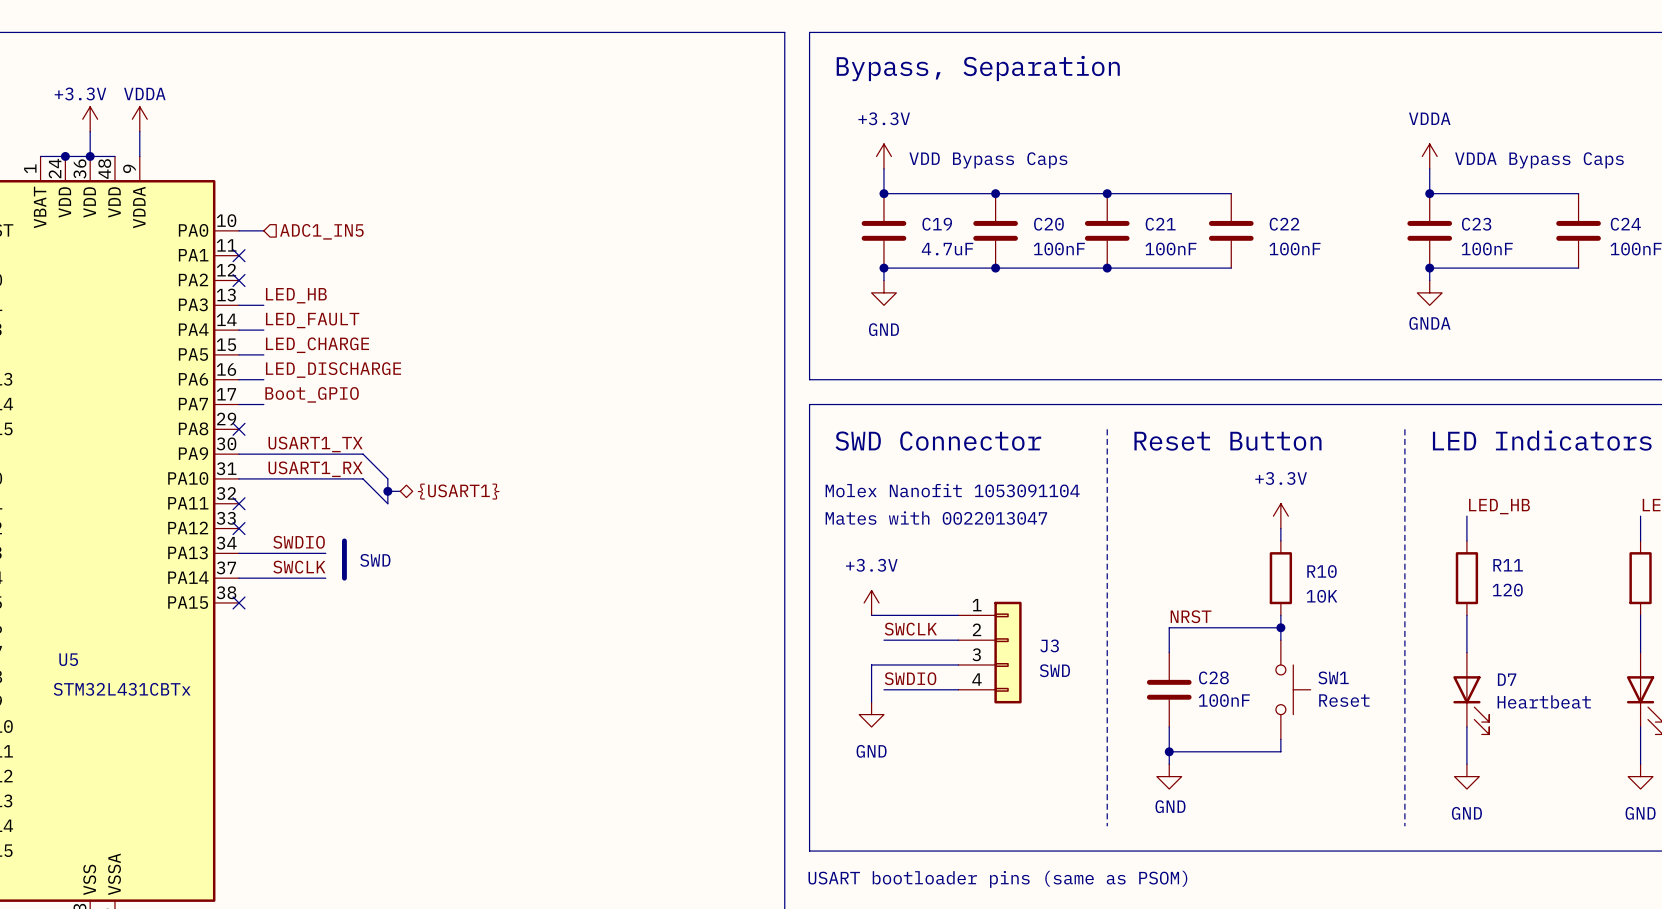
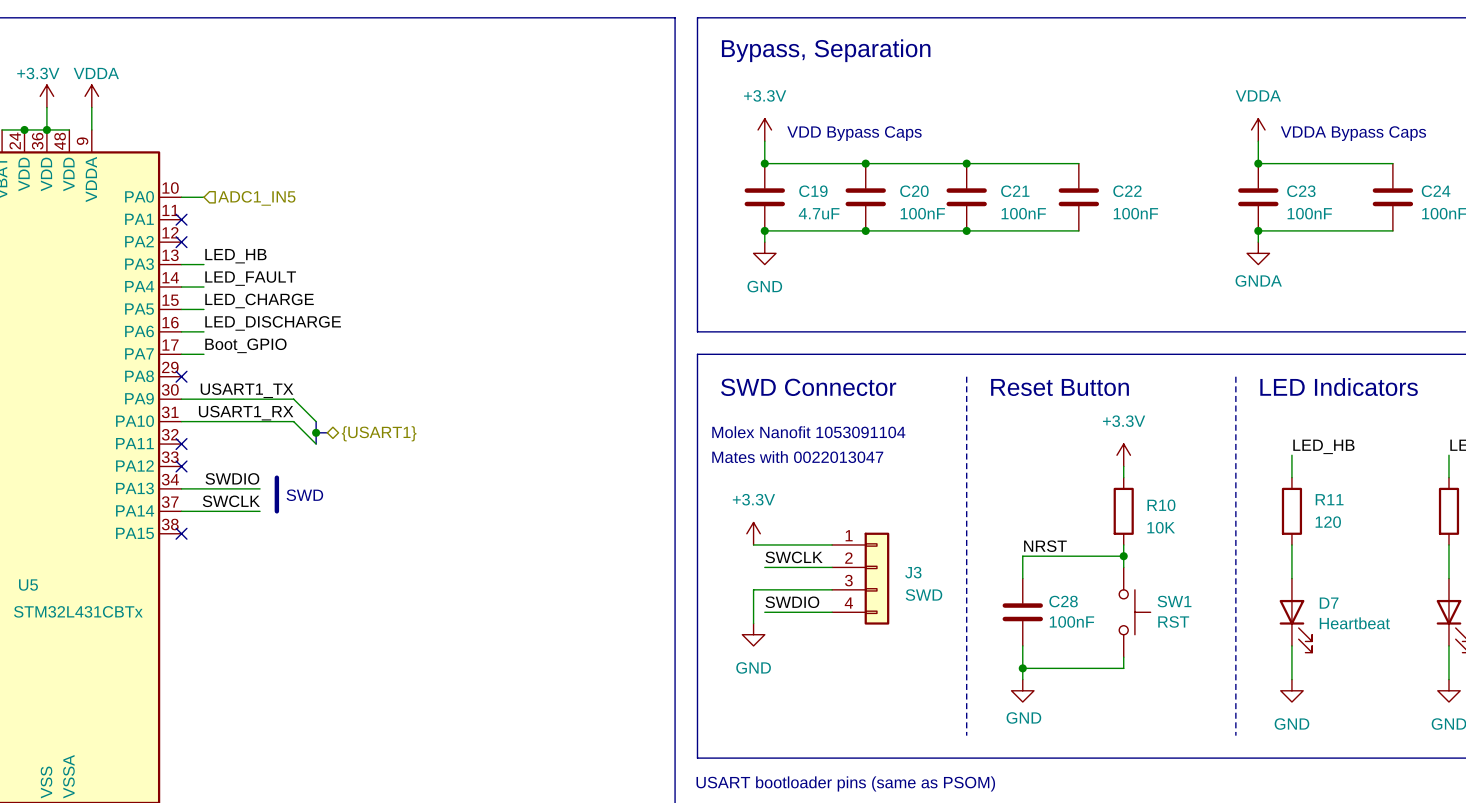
SW1 value: Reset (1344, 700) -> RST (1173, 621)

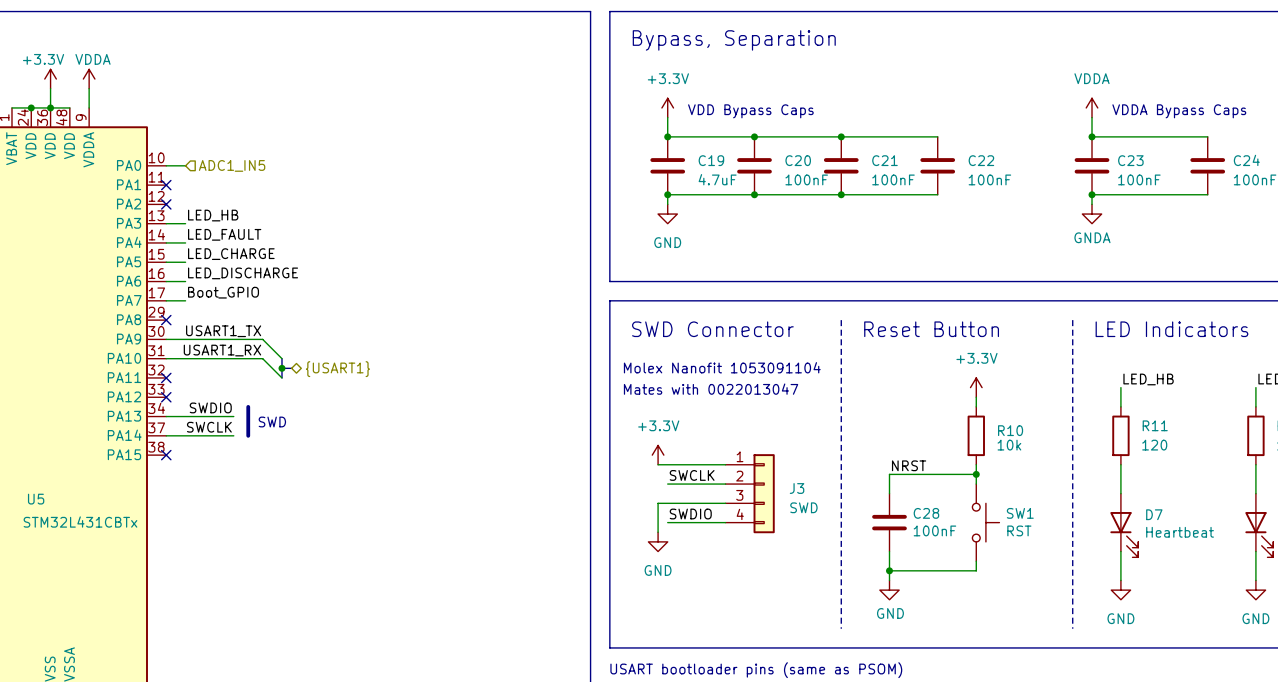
R10 value: 10K (1161, 527) -> 10k (1009, 445)

